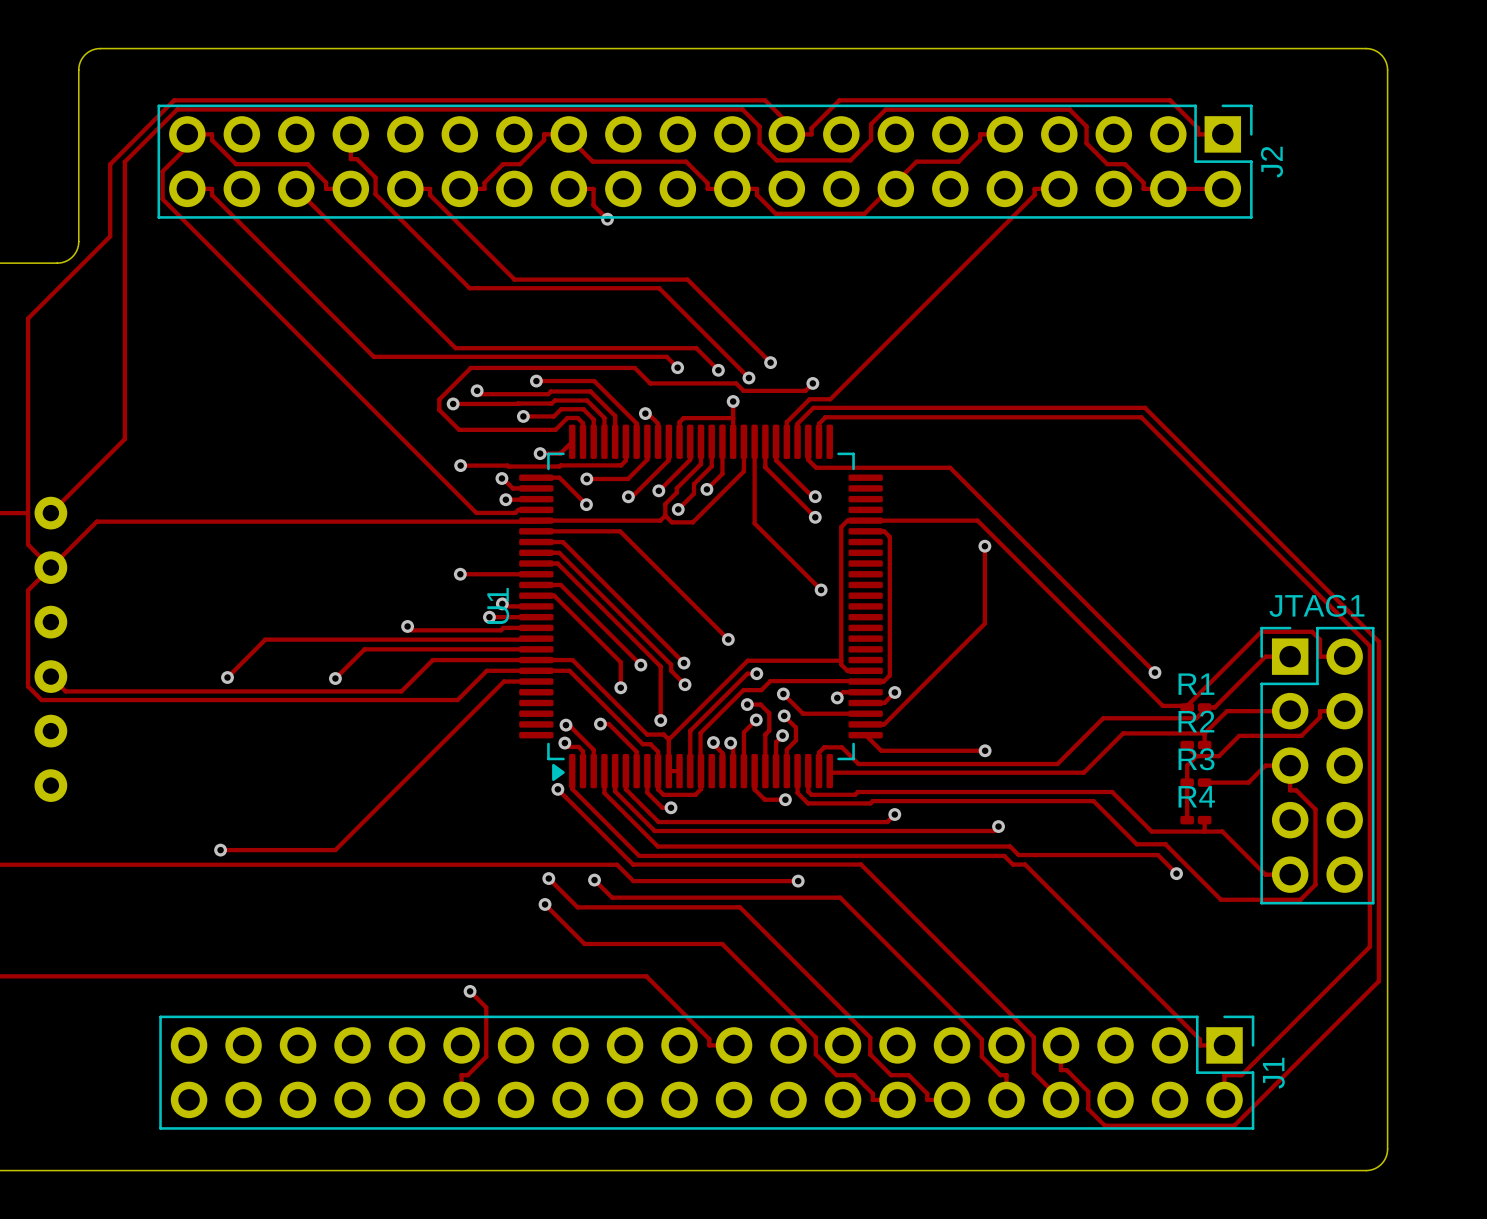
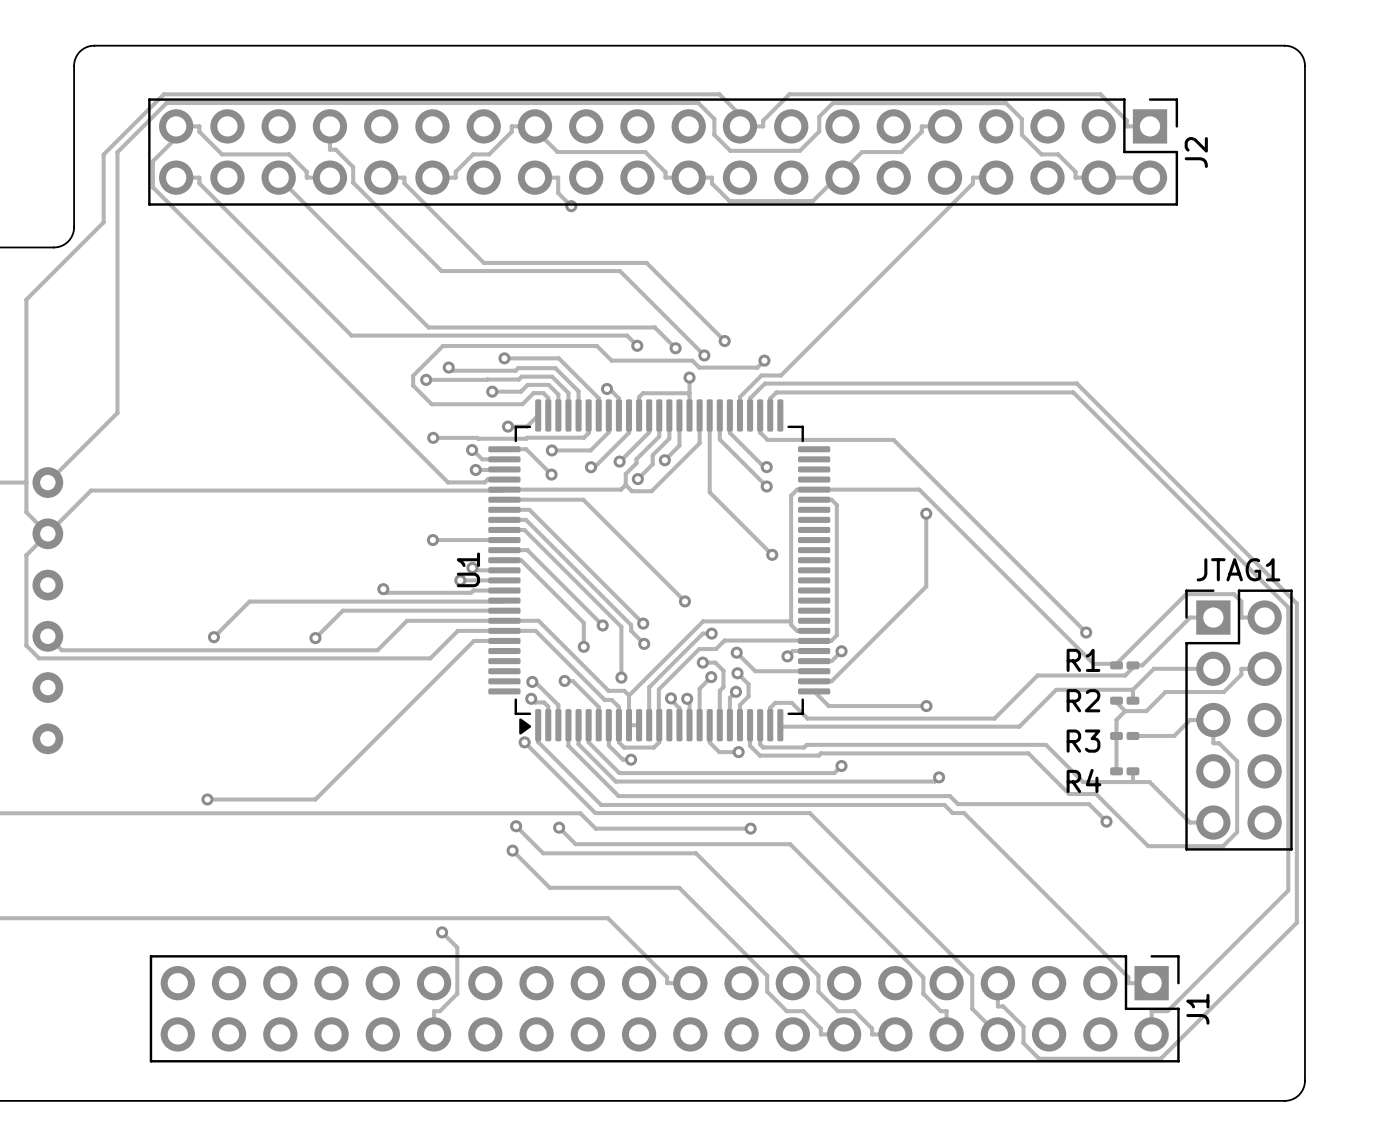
R1 name position: R1 (1196, 684) -> R1 (1083, 660)
R2 name position: R2 (1196, 721) -> R2 (1083, 700)
R3 name position: R3 (1196, 759) -> R3 (1083, 741)
R4 name position: R4 (1196, 796) -> R4 (1083, 780)

